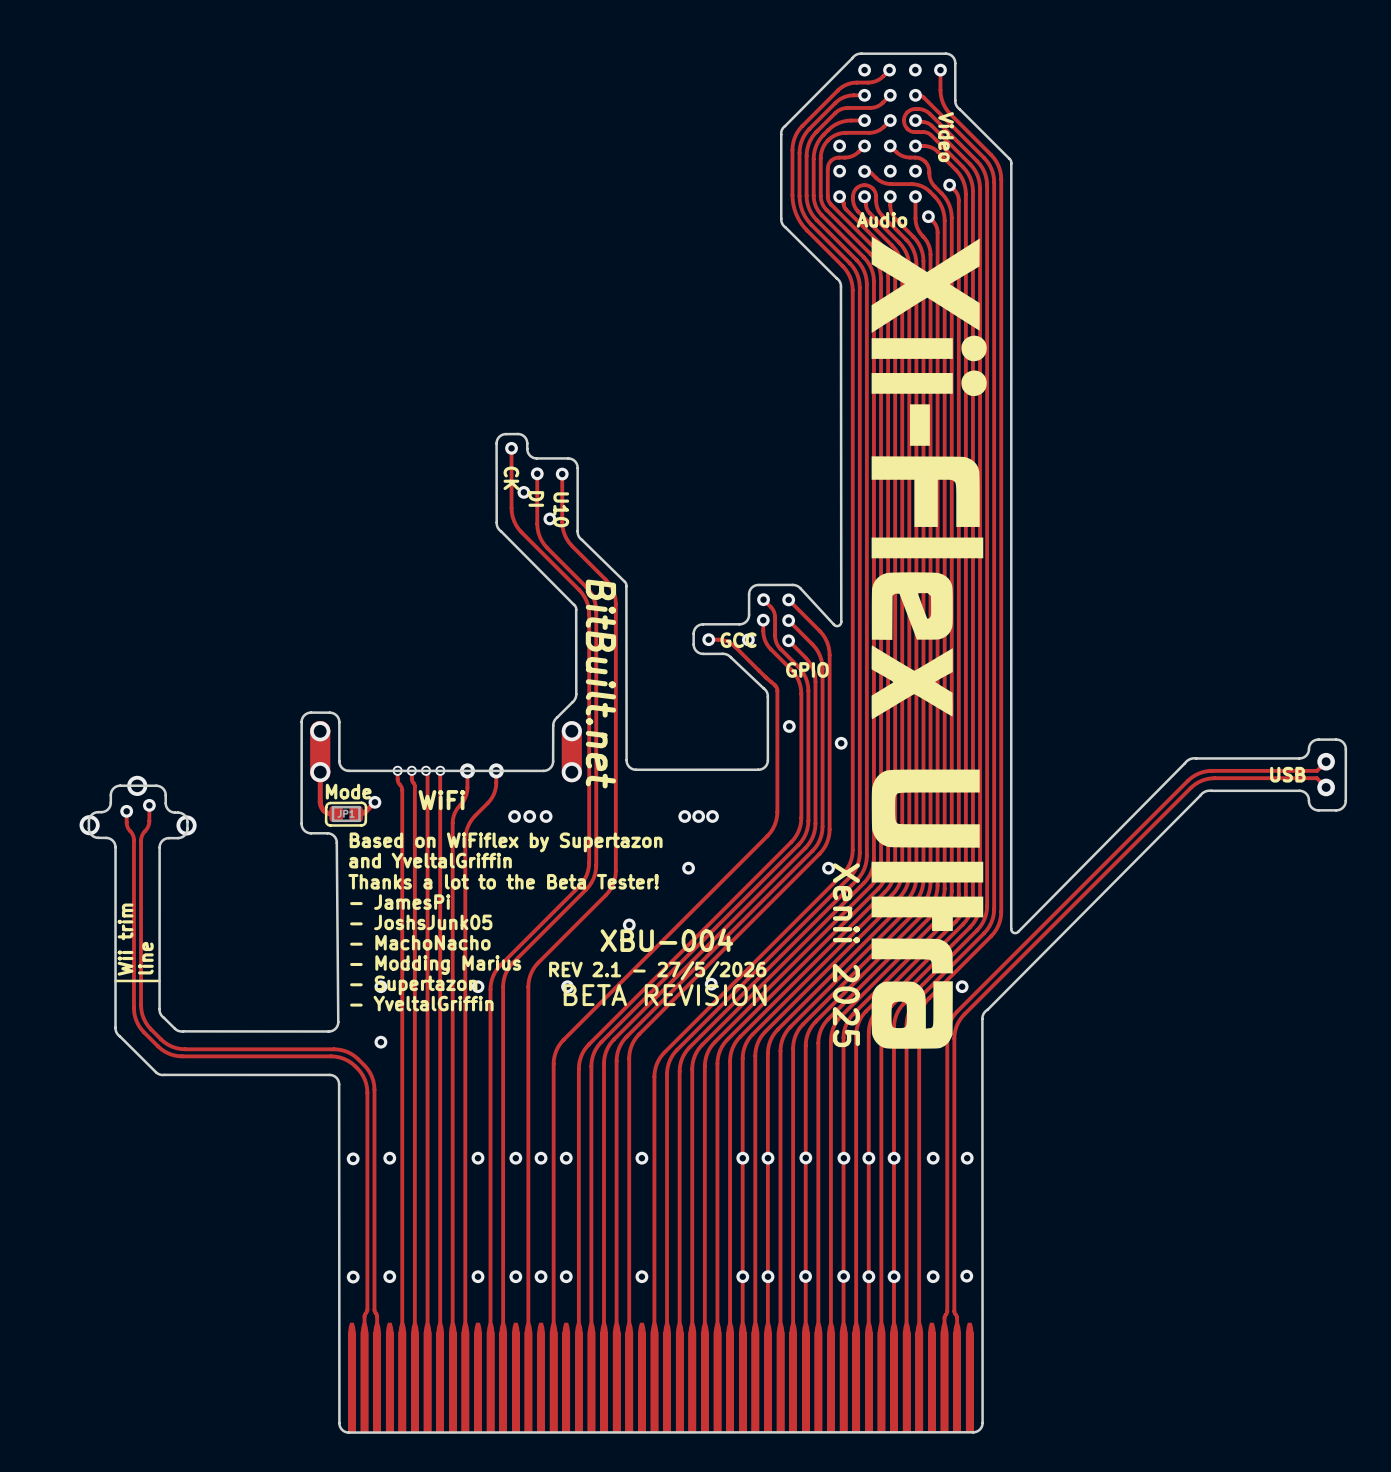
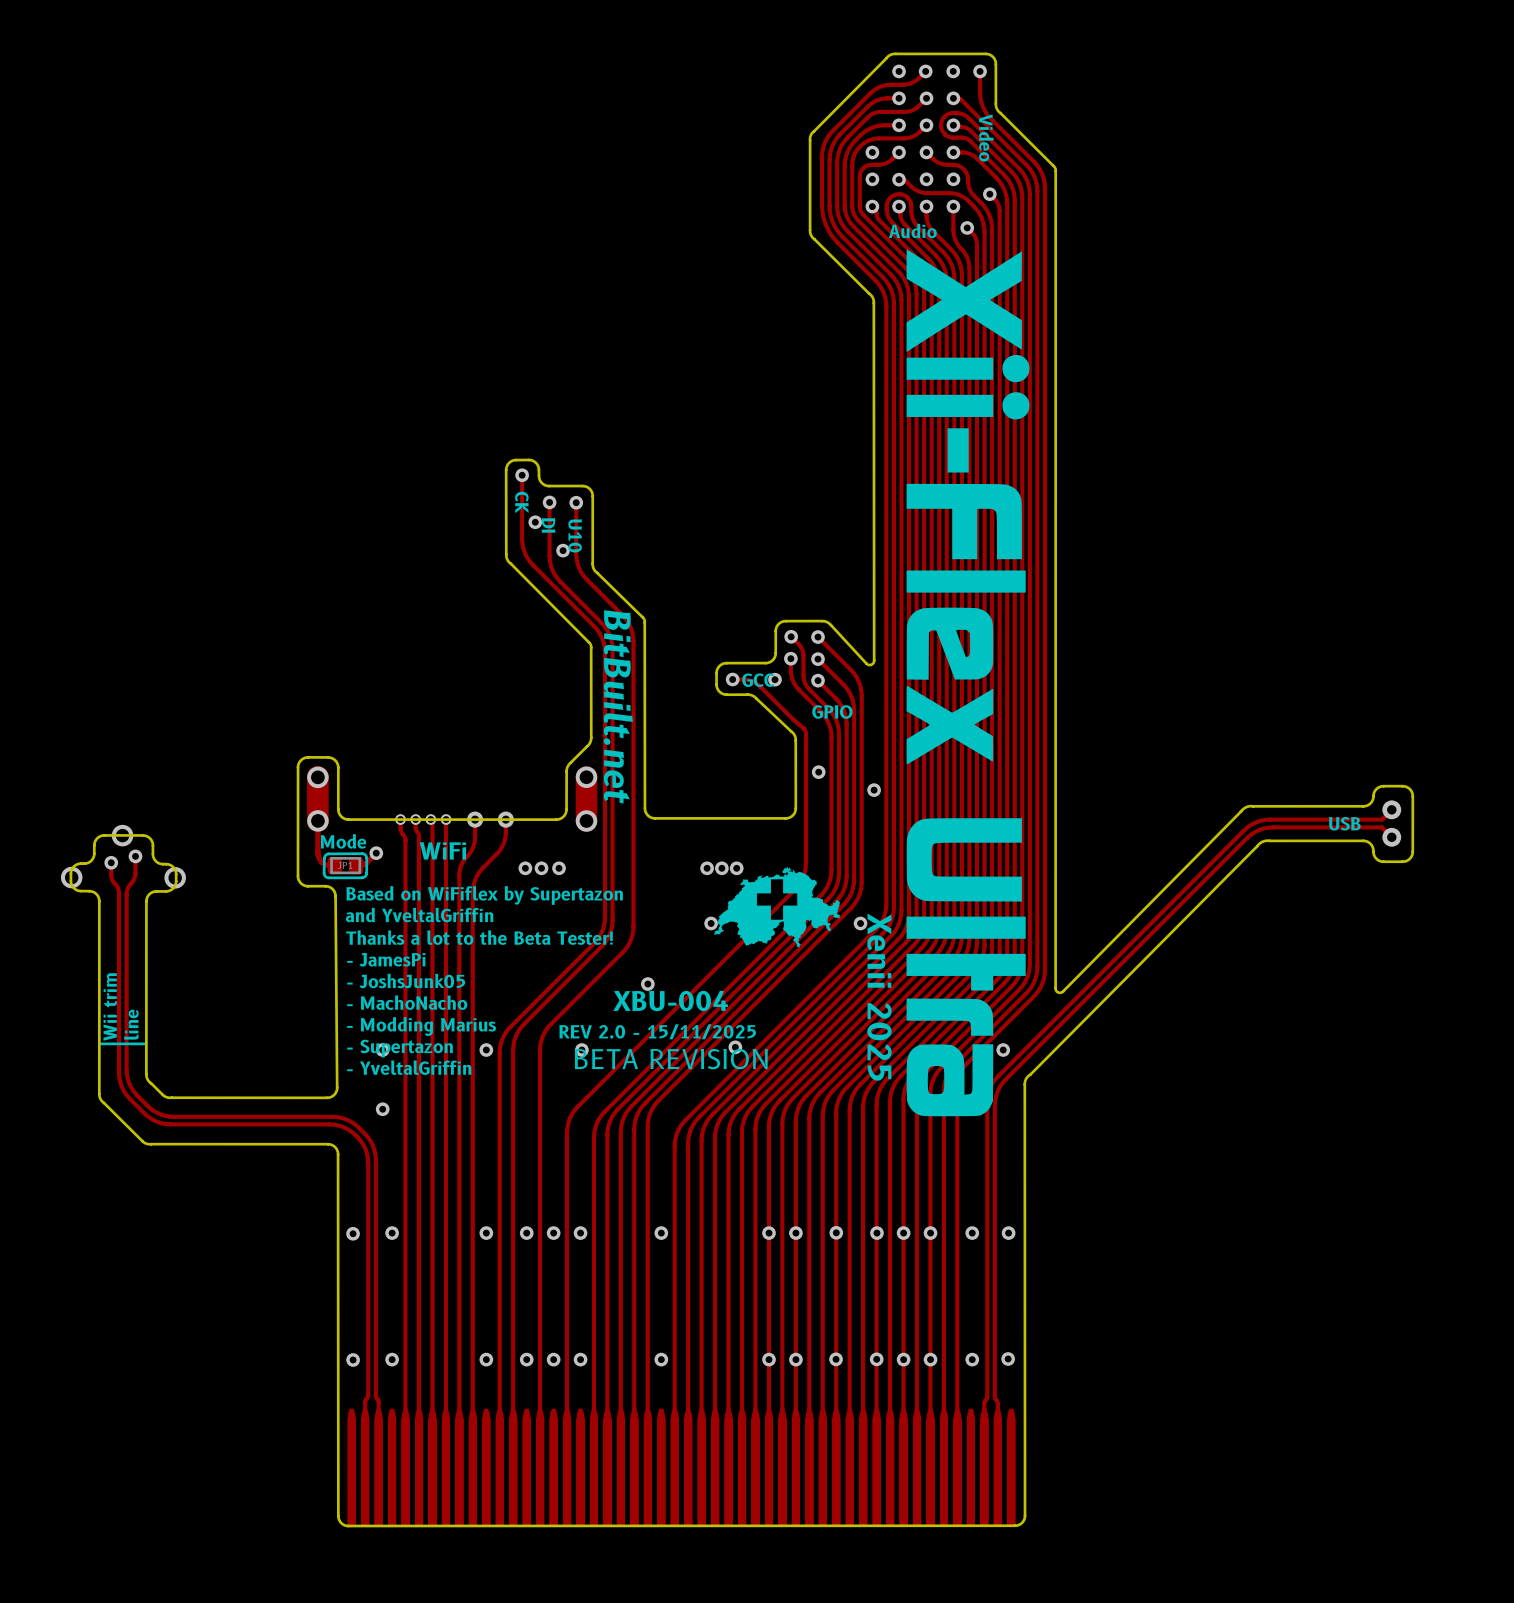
drawing: none -> [714, 867, 840, 948]
text: REV 2.1 - 27/5/2026 (657, 970) -> REV 2.0 - 15/11/2025 (657, 1031)

